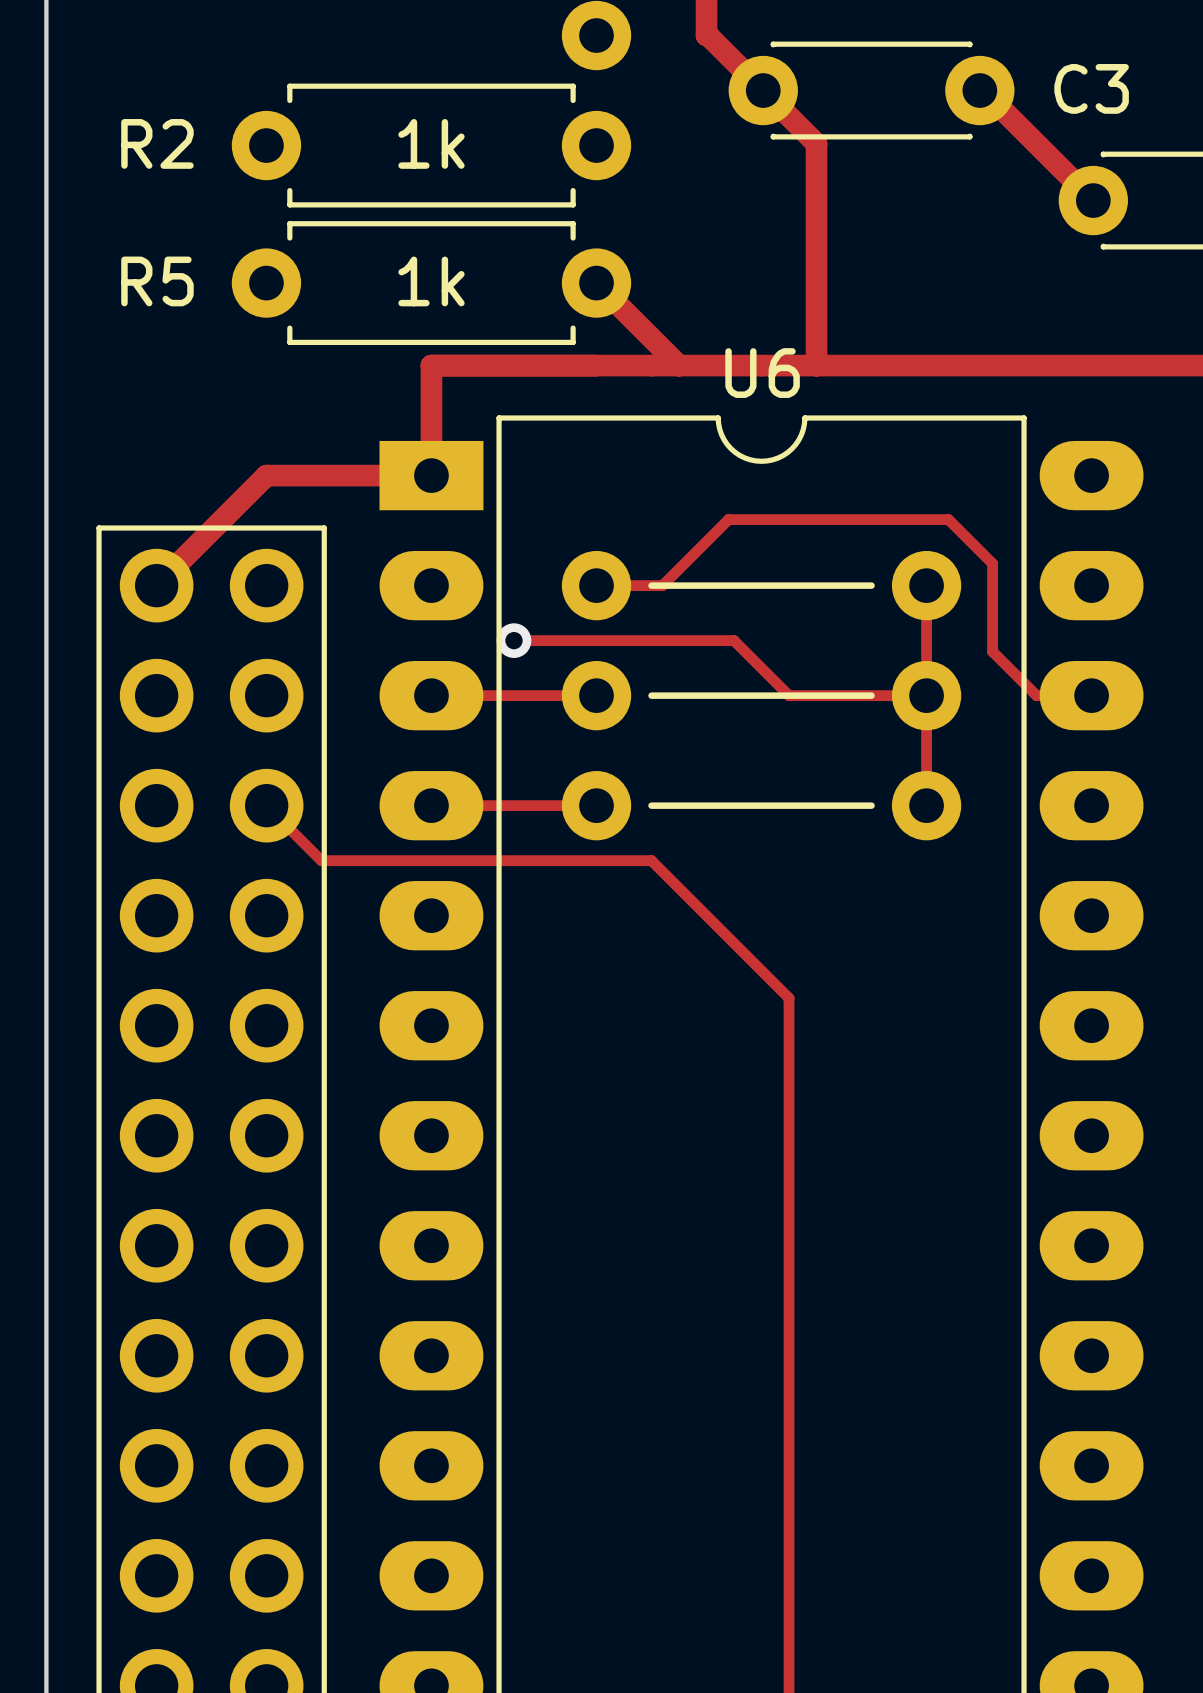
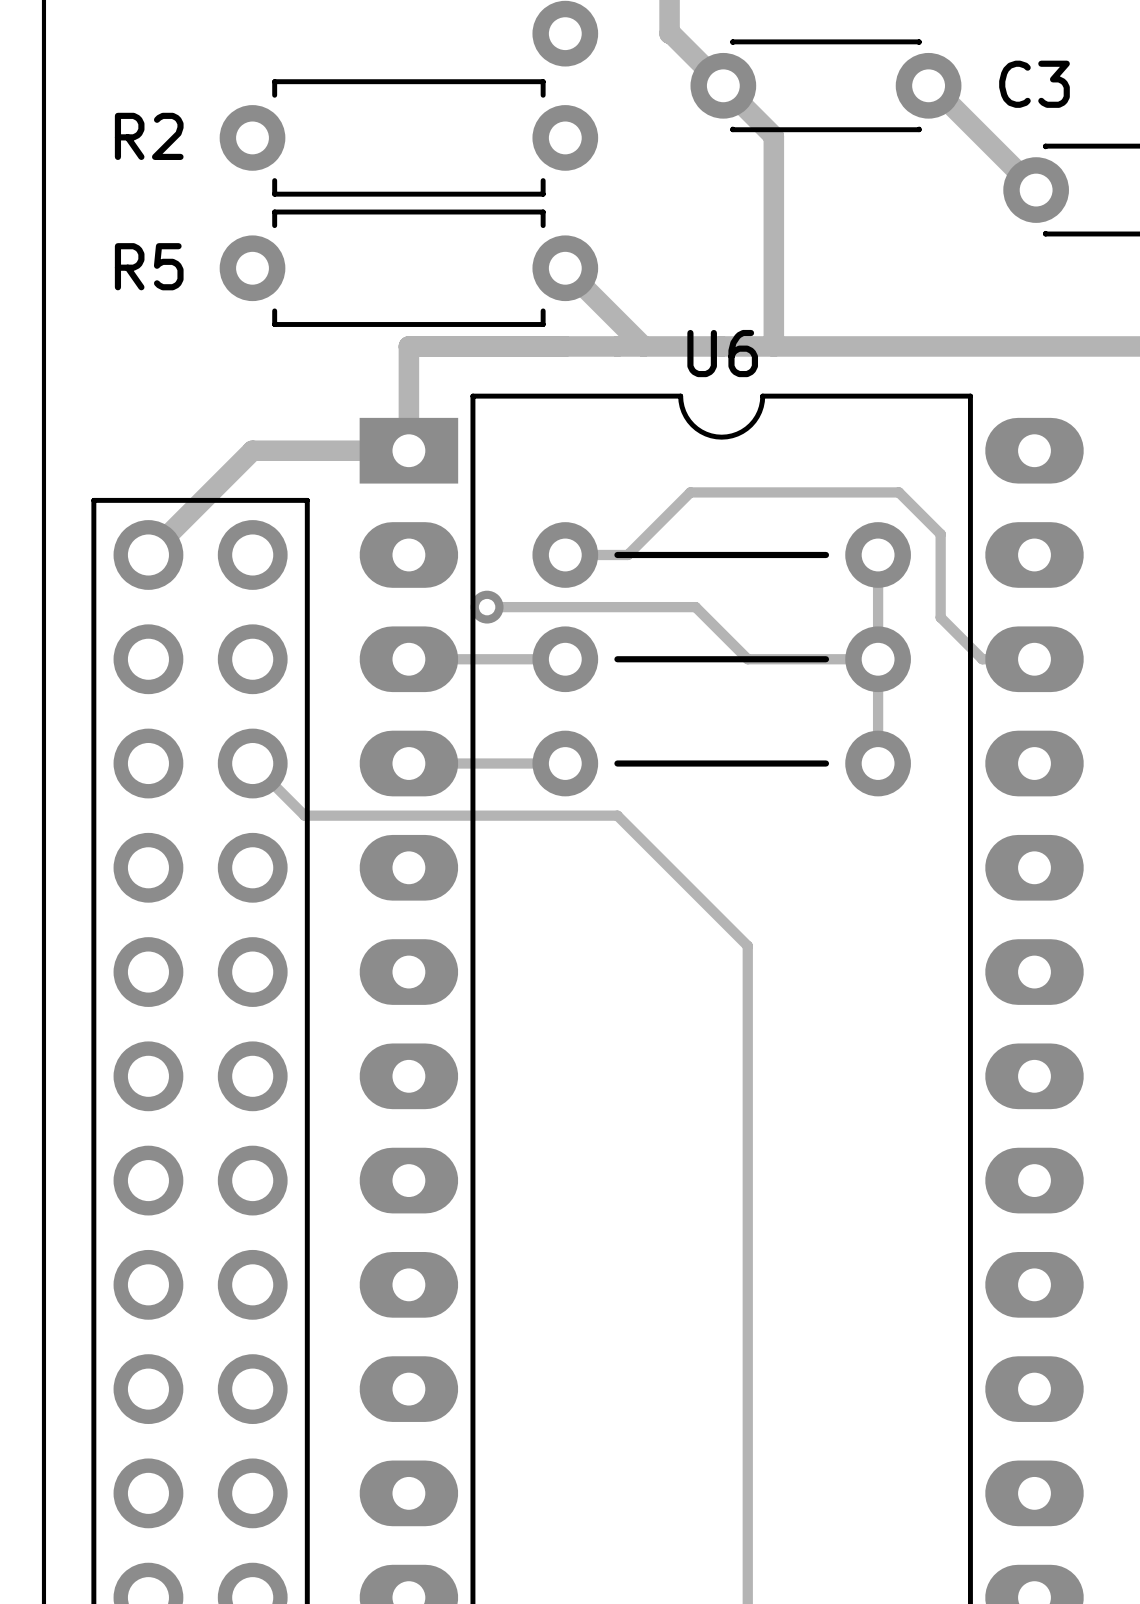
R2 value: 1k (431, 143) -> none
R5 value: 1k (431, 281) -> none

